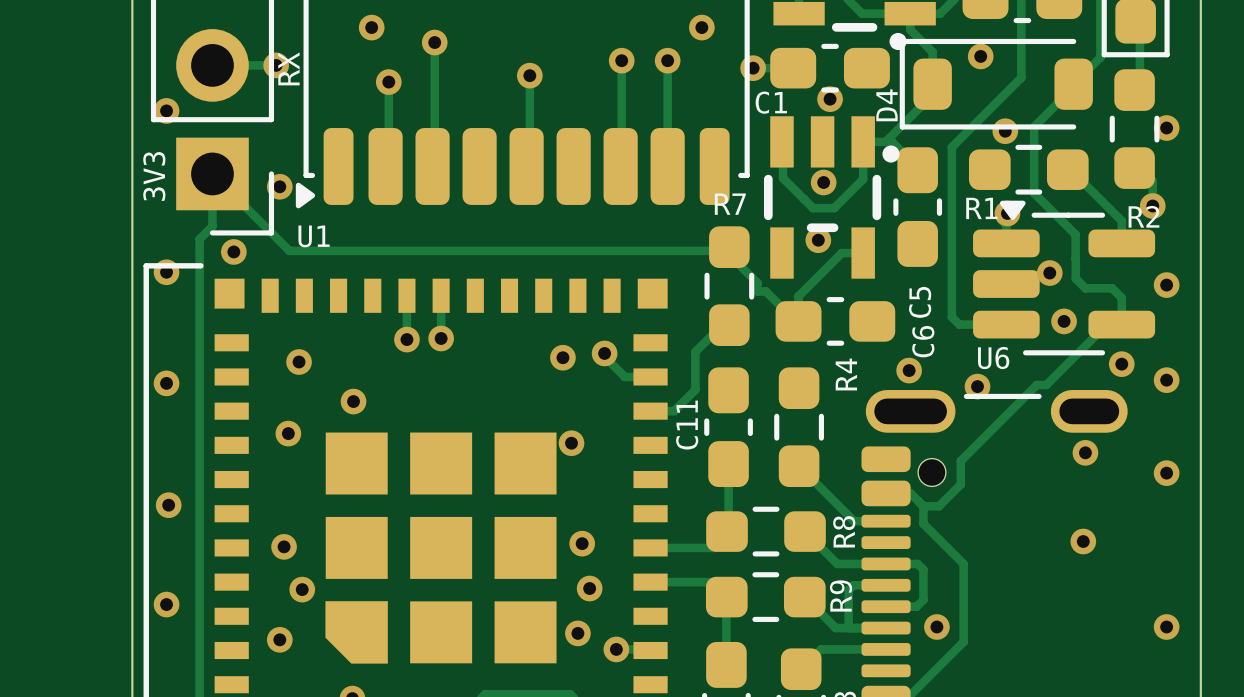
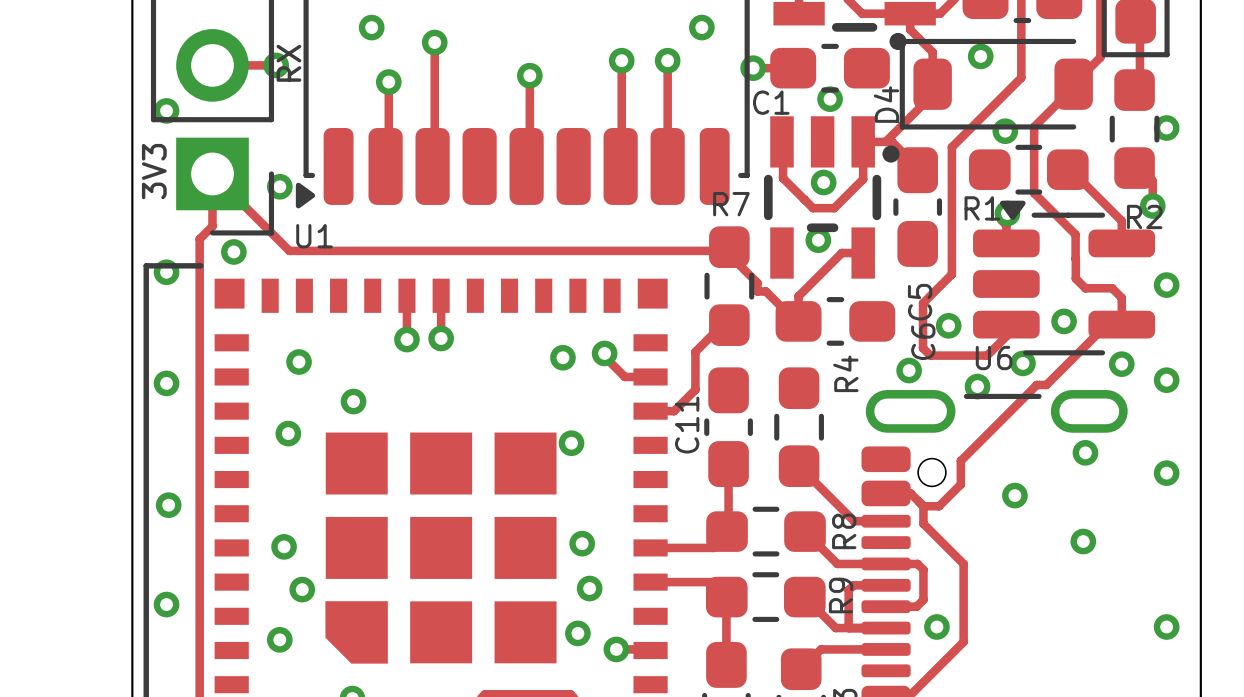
via: (1049, 273) -> none
track: (951, 274) (951, 317) (959, 324) (1006, 324) -> (951, 274) (923, 303) (923, 348) (930, 355) (987, 355) (1006, 336) (1006, 324)
via: none -> (948, 325)
via: none -> (1022, 363)
via: none -> (1014, 495)

